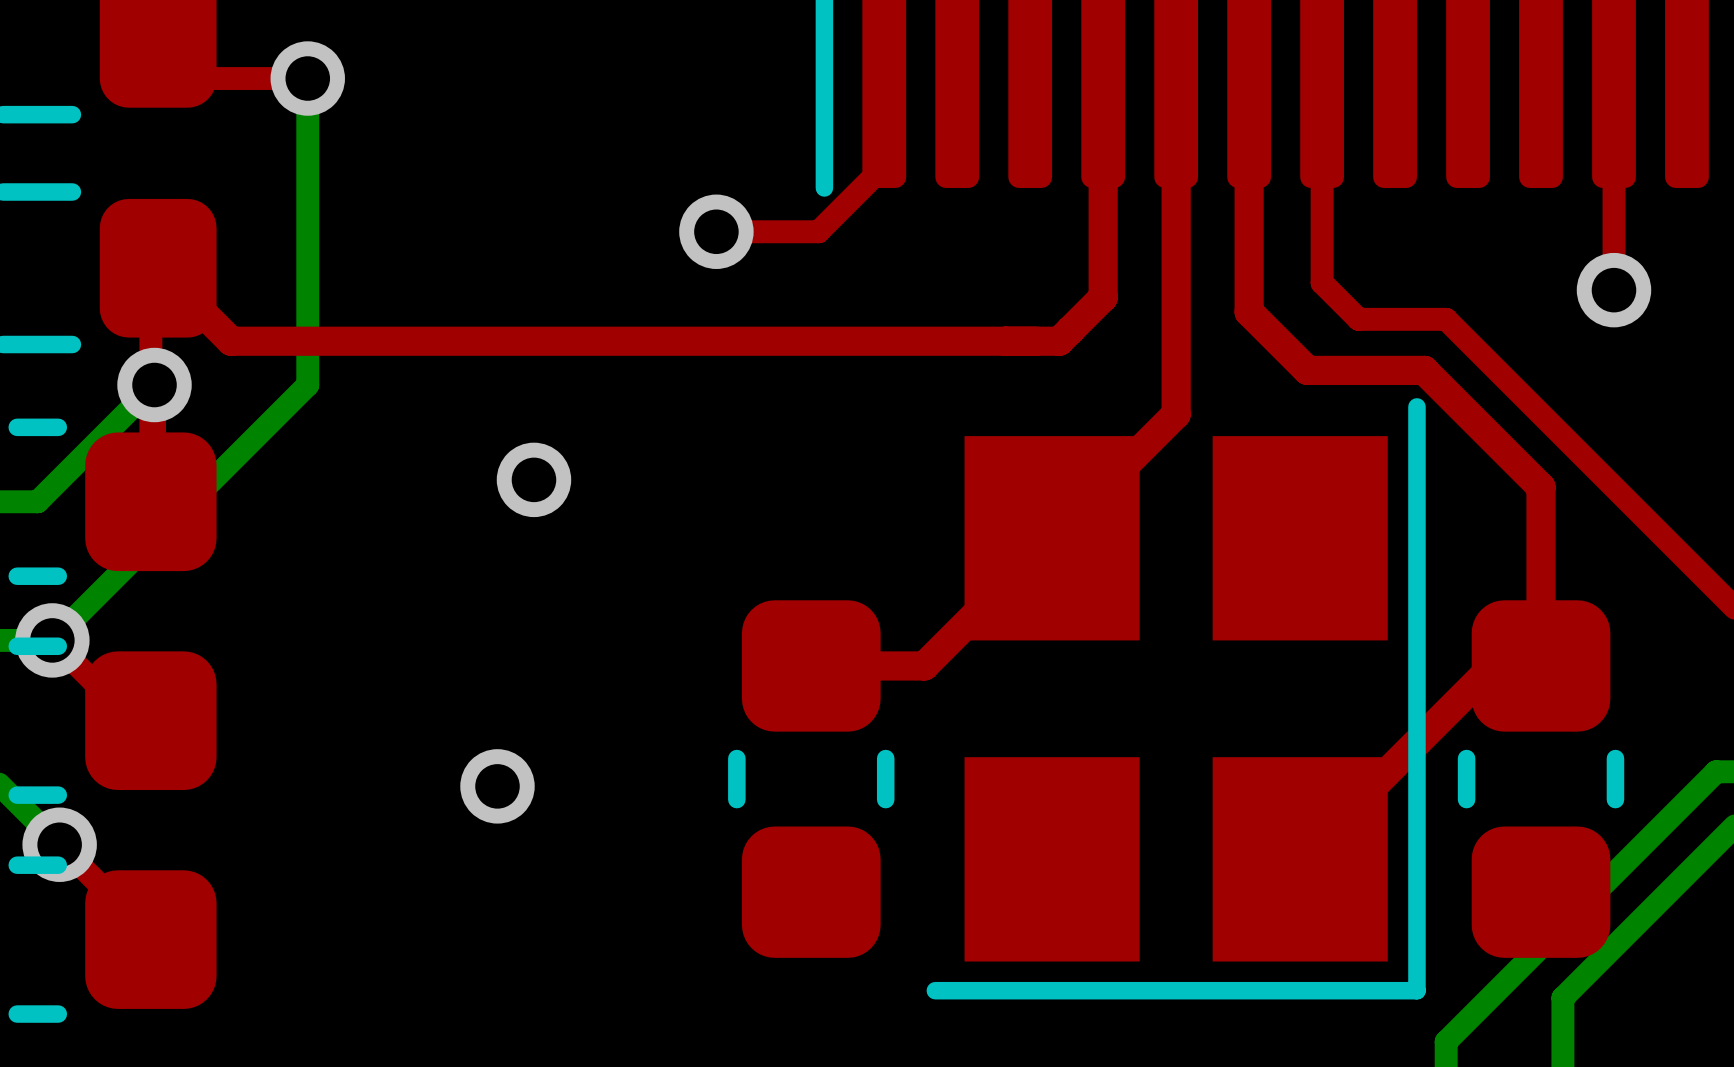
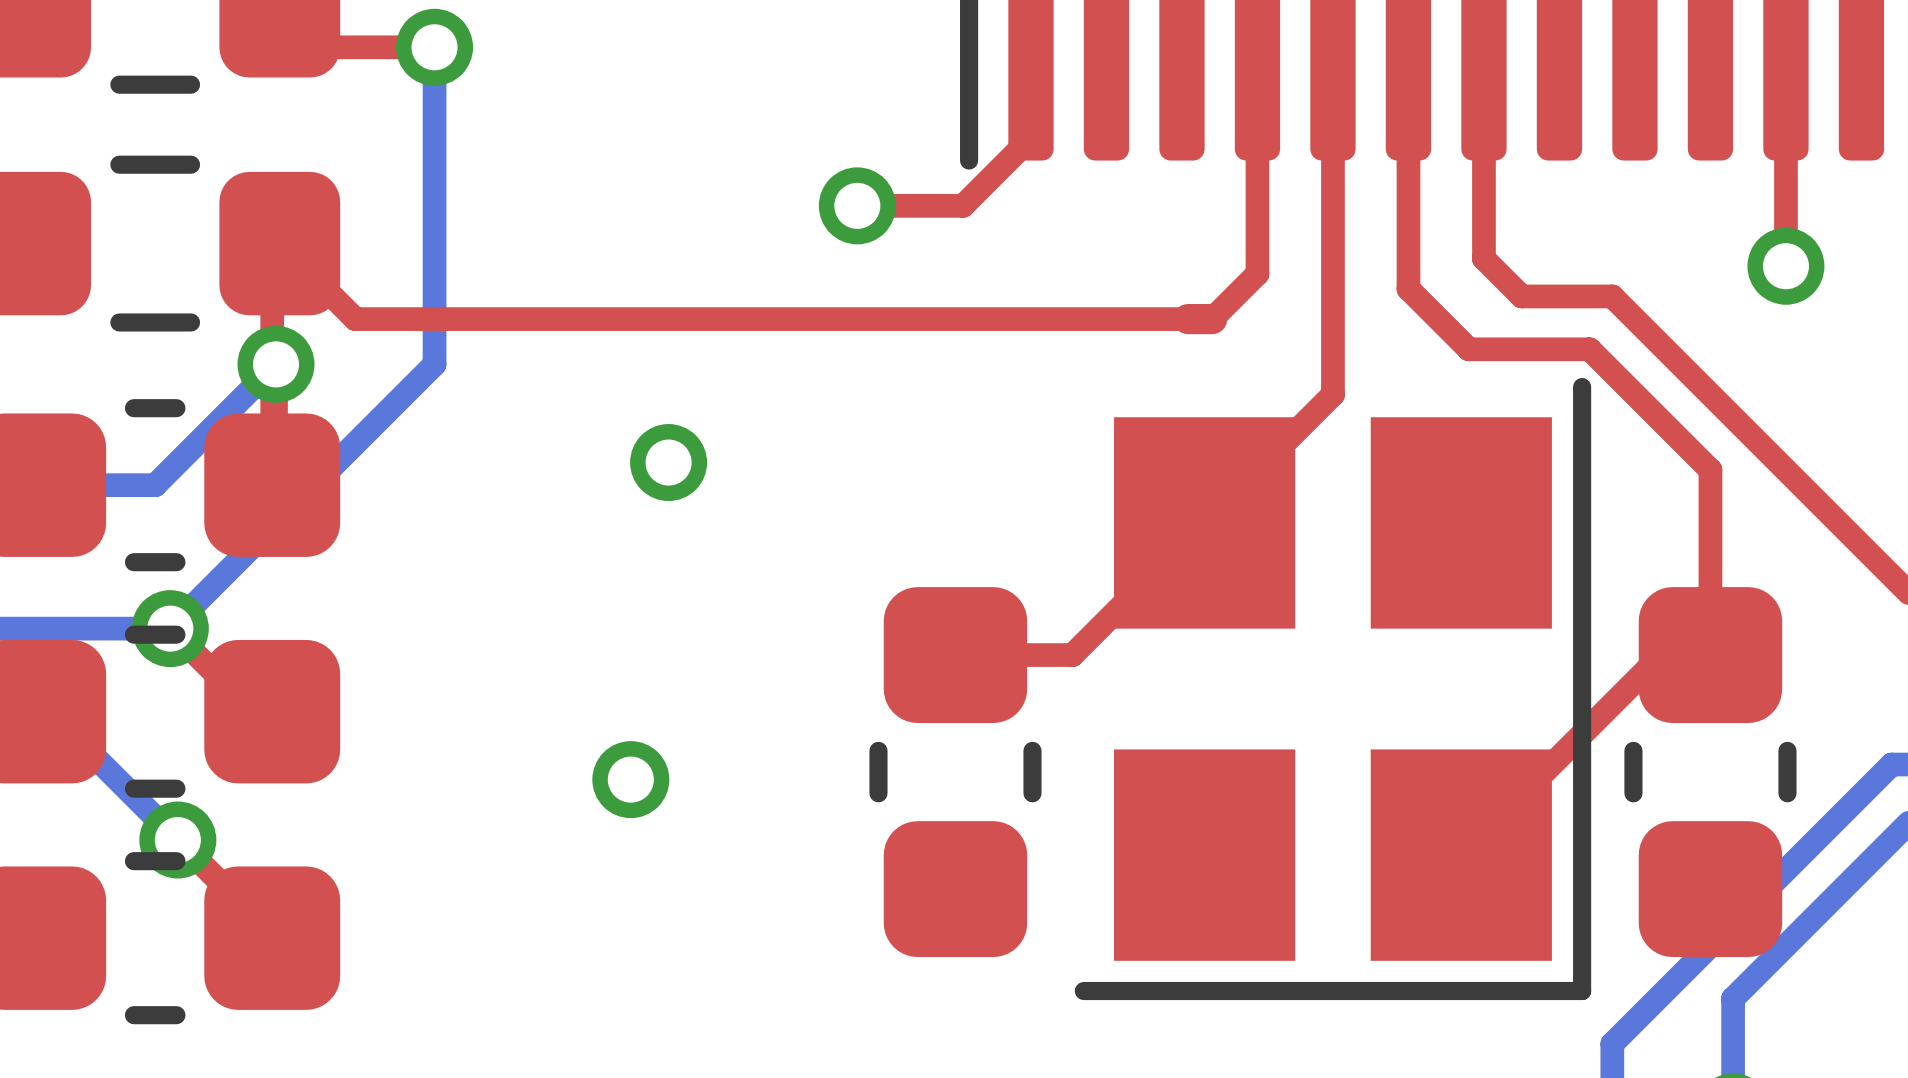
top track width: thick (1103, 74) (1103, 297) (1059, 341) -> thin (1257, 43) (1257, 273) (1212, 319)
top track width: thick (1176, 74) (1176, 414) (924, 665) (811, 665) -> thin (1332, 43) (1332, 394) (1072, 655) (955, 655)
top track width: thick (1249, 74) (1249, 312) (1307, 370) (1424, 370) (1541, 487) (1541, 665) (1493, 665) (1300, 859) -> thin (1408, 43) (1408, 288) (1468, 349) (1589, 349) (1710, 470) (1710, 655) (1661, 655) (1461, 855)
top track width: thick (158, 268) (231, 341) (1036, 341) -> thin (279, 243) (355, 319) (1188, 319)

